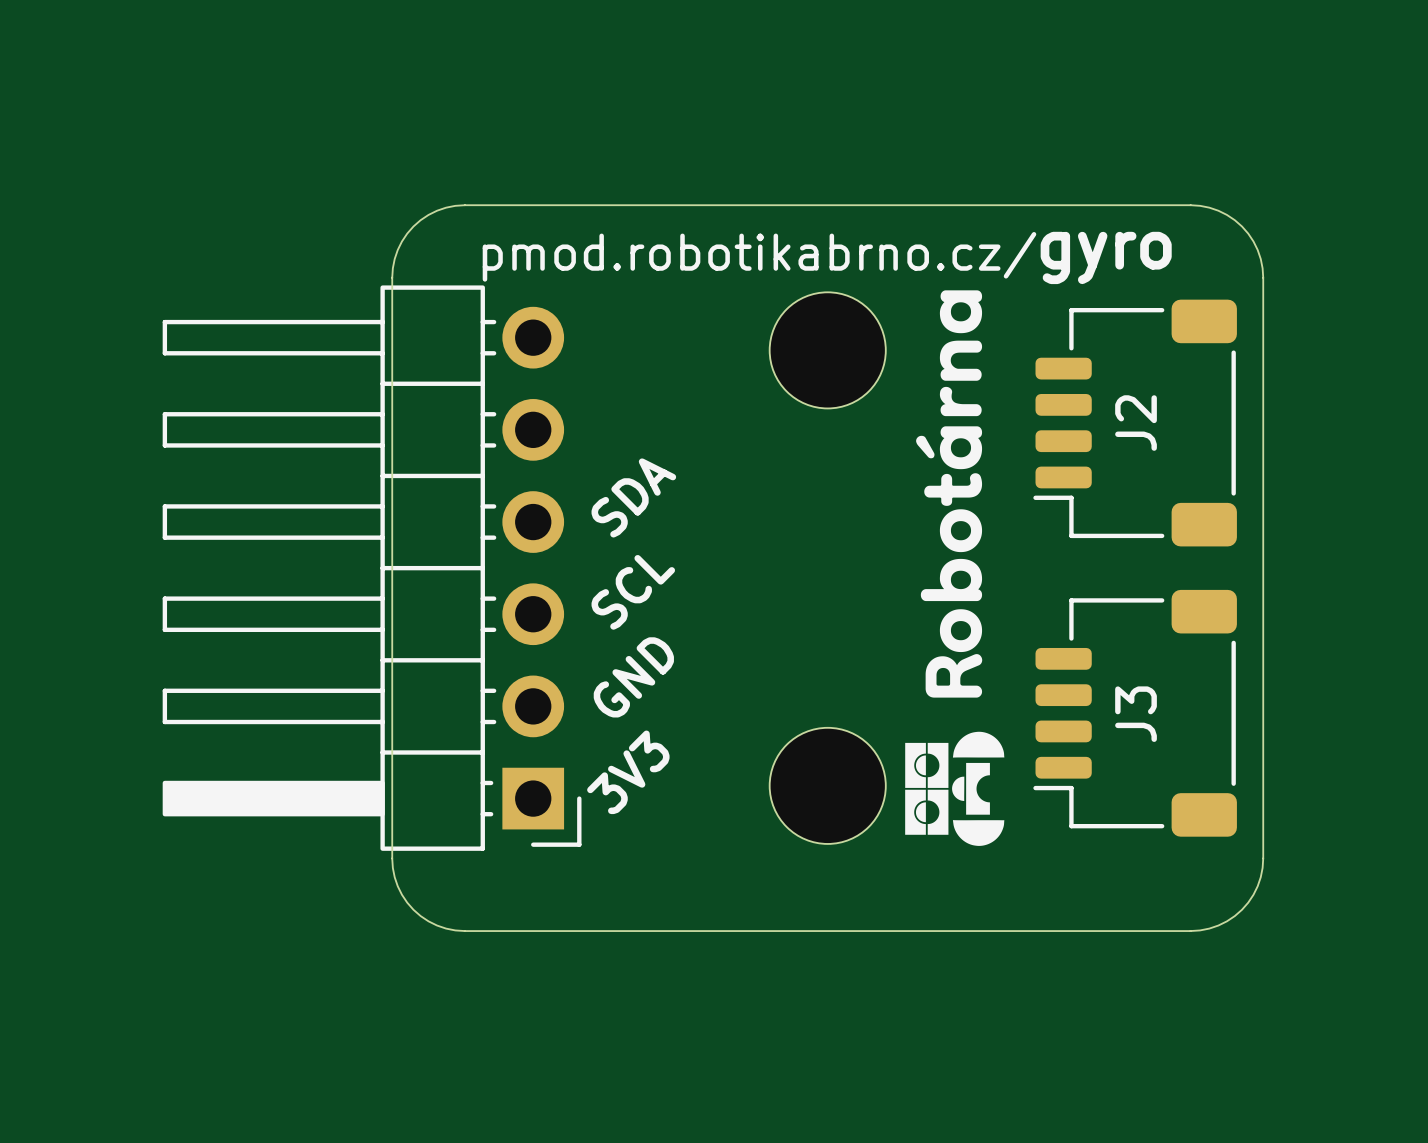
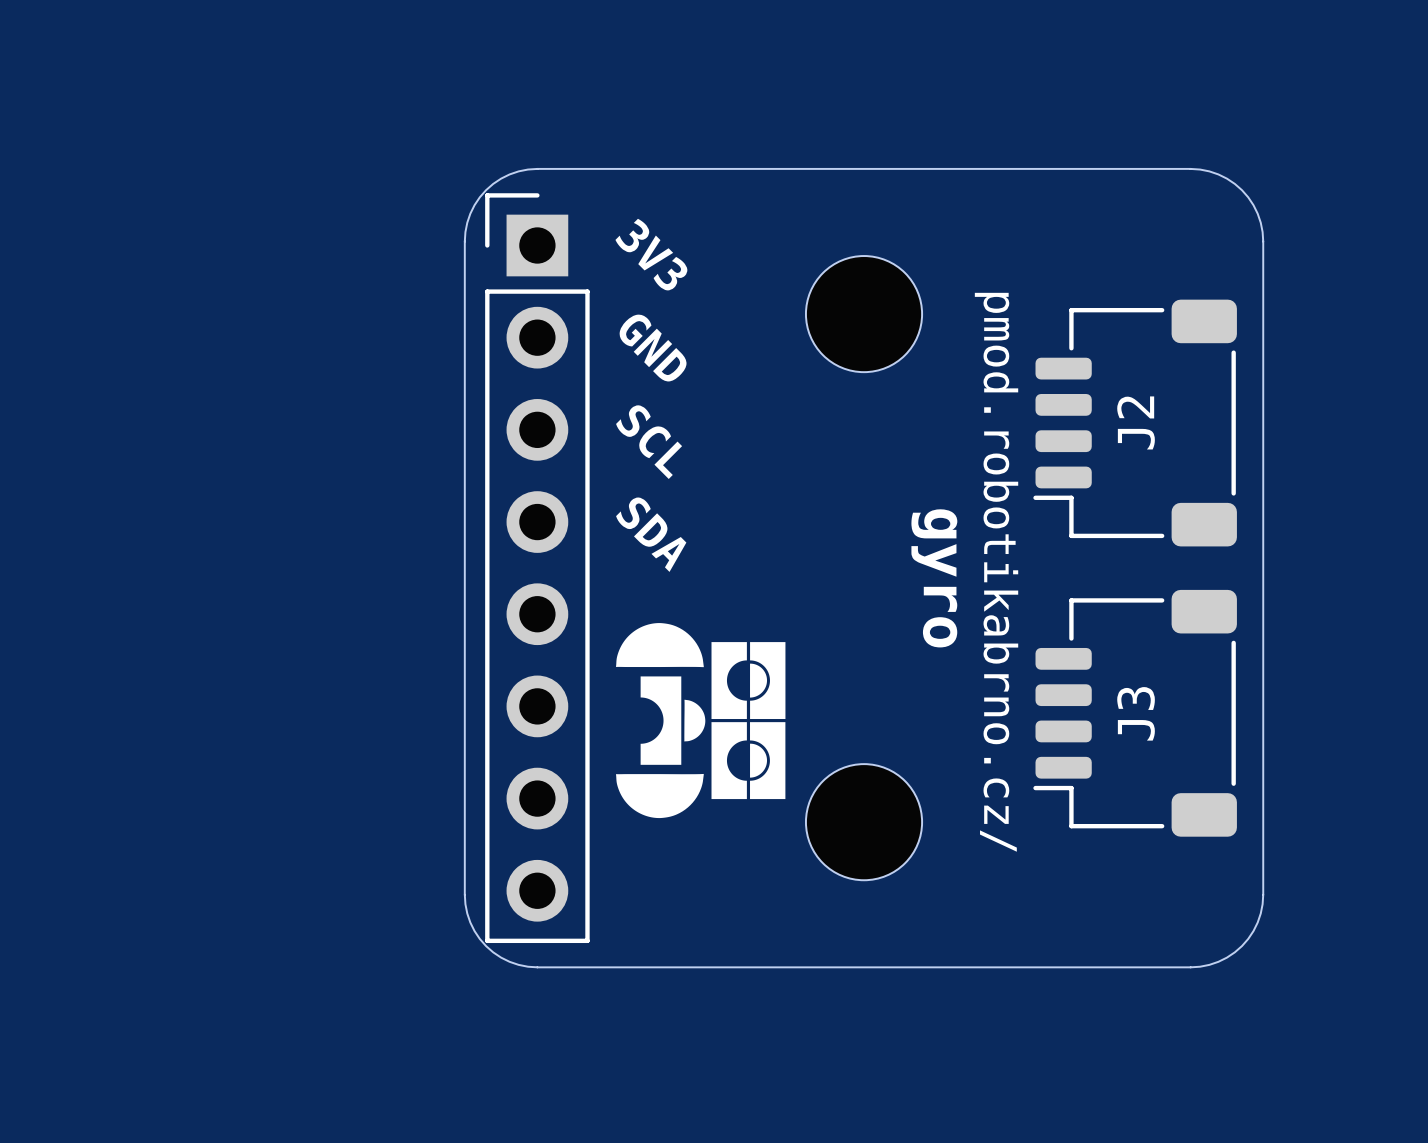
text rotation: 0° (759, 256) -> 90° clockwise (996, 572)
text rotation: 0° (1106, 257) -> 90° clockwise (934, 578)
text position: gyro (1106, 257) -> gyro (934, 578)
board edge: (392, 277) (392, 858) (394, 877) (401, 894) (413, 909) (428, 921) (446, 928) (464, 931) (1200, 930) (1226, 921) (1241, 909) (1257, 886) (1263, 858) -> (1263, 277) (1262, 232) (1253, 205) (1241, 190) (1226, 178) (1209, 171) (1190, 168) (527, 169) (501, 178) (479, 197) (467, 222) (464, 241) (464, 894) (467, 913) (474, 931) (493, 952) (509, 961) (537, 967) (1200, 966) (1226, 957) (1241, 946) (1253, 931) (1262, 904) (1263, 858)
board edge: (392, 277) (397, 250) (413, 226) (437, 210) (455, 205) (1190, 205) (1218, 210) (1241, 226) (1257, 250) (1263, 277) -> none
drawing: [905, 290, 1005, 846] -> none
part position: (827, 350) -> (864, 314)
text rotation: 0° (633, 497) -> 90° clockwise (651, 534)
part: (372, 568) -> none
part: none -> (537, 568)
text rotation: 0° (633, 592) -> 90° clockwise (649, 442)
text position: SCL (633, 592) -> SCL (649, 442)
drawing: none -> [615, 623, 786, 819]
text rotation: 0° (633, 677) -> 90° clockwise (652, 347)
text position: GND (633, 677) -> GND (652, 347)
text rotation: 0° (628, 772) -> 90° clockwise (651, 254)
text position: 3V3 (628, 772) -> 3V3 (651, 254)
part position: (827, 785) -> (864, 822)

